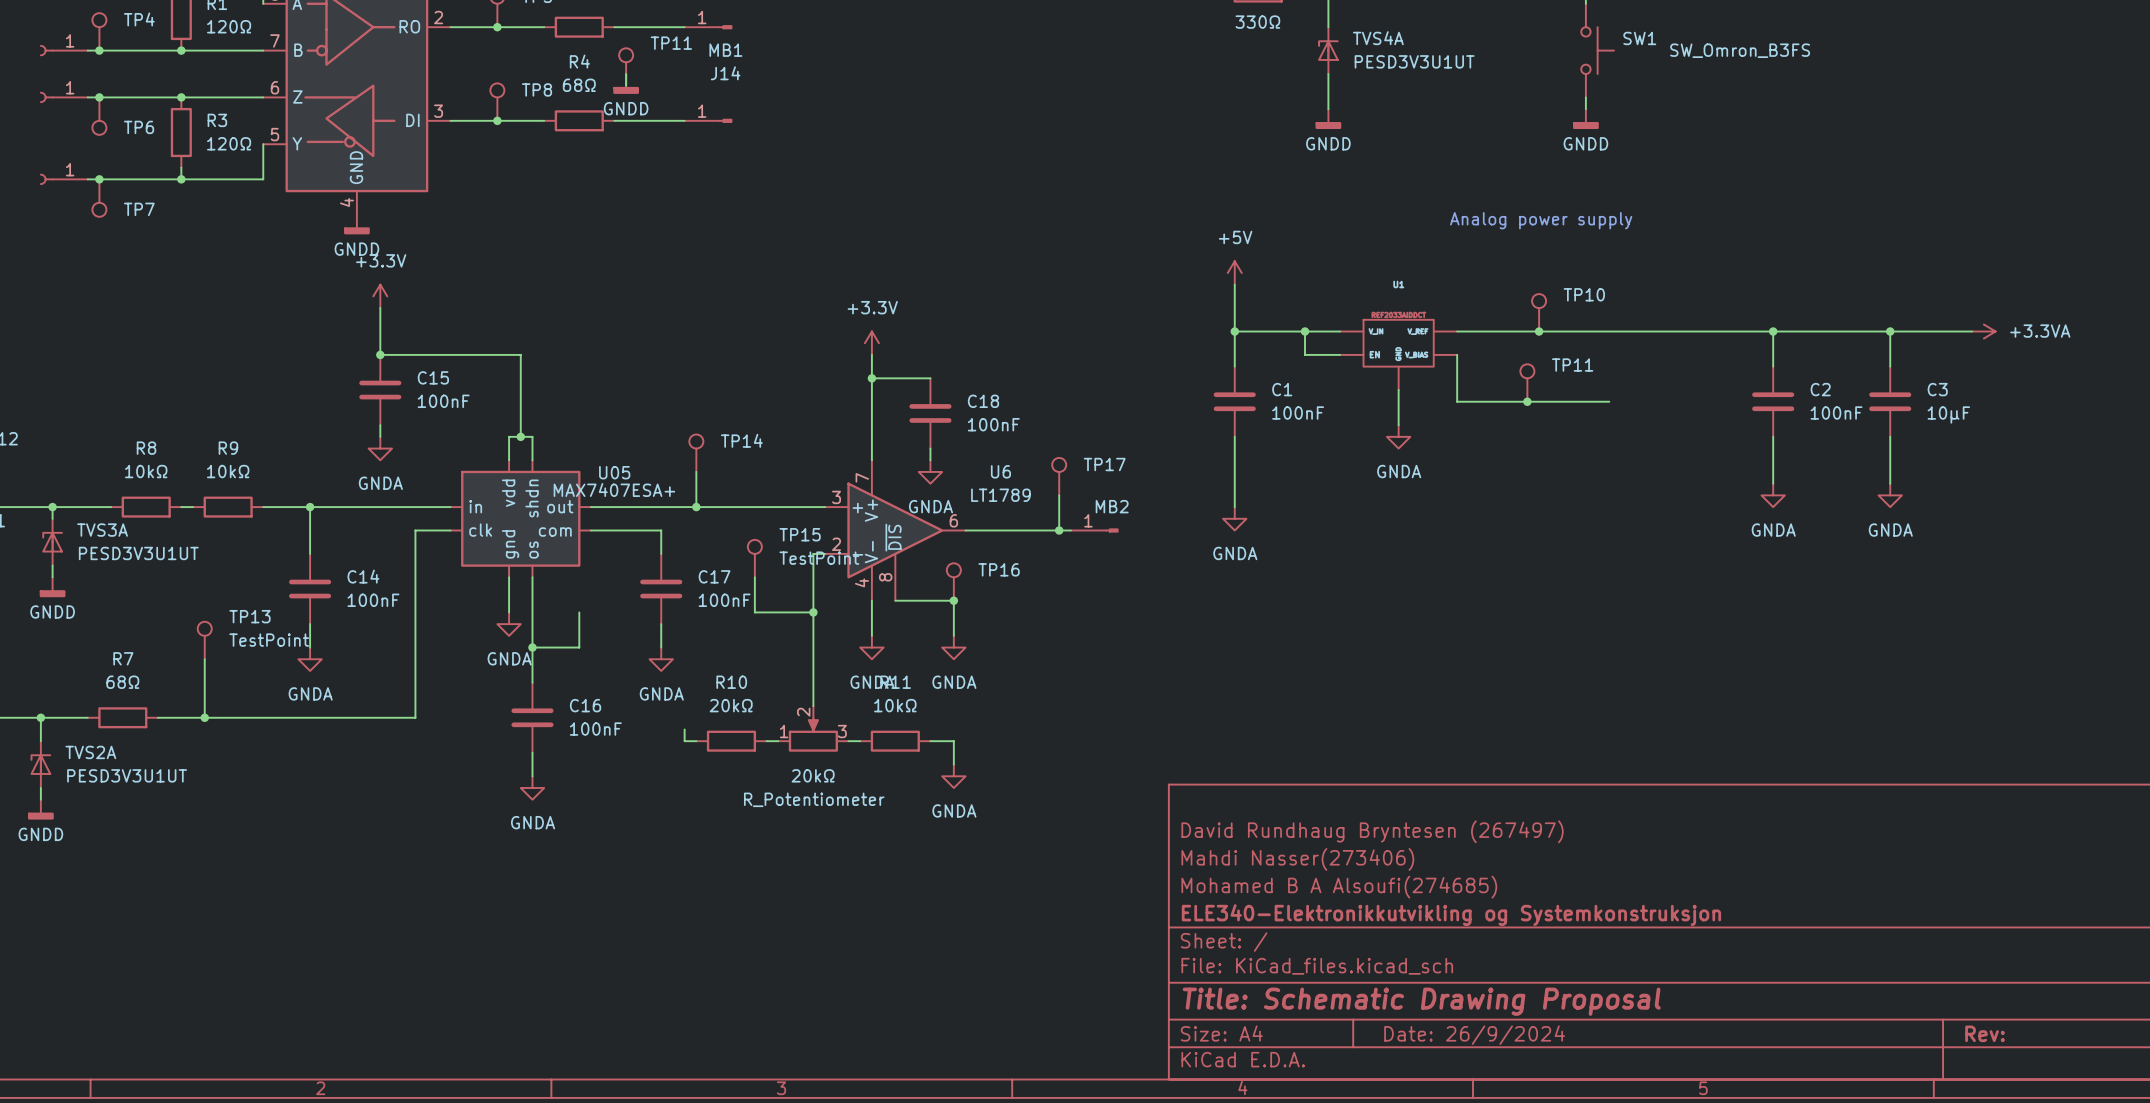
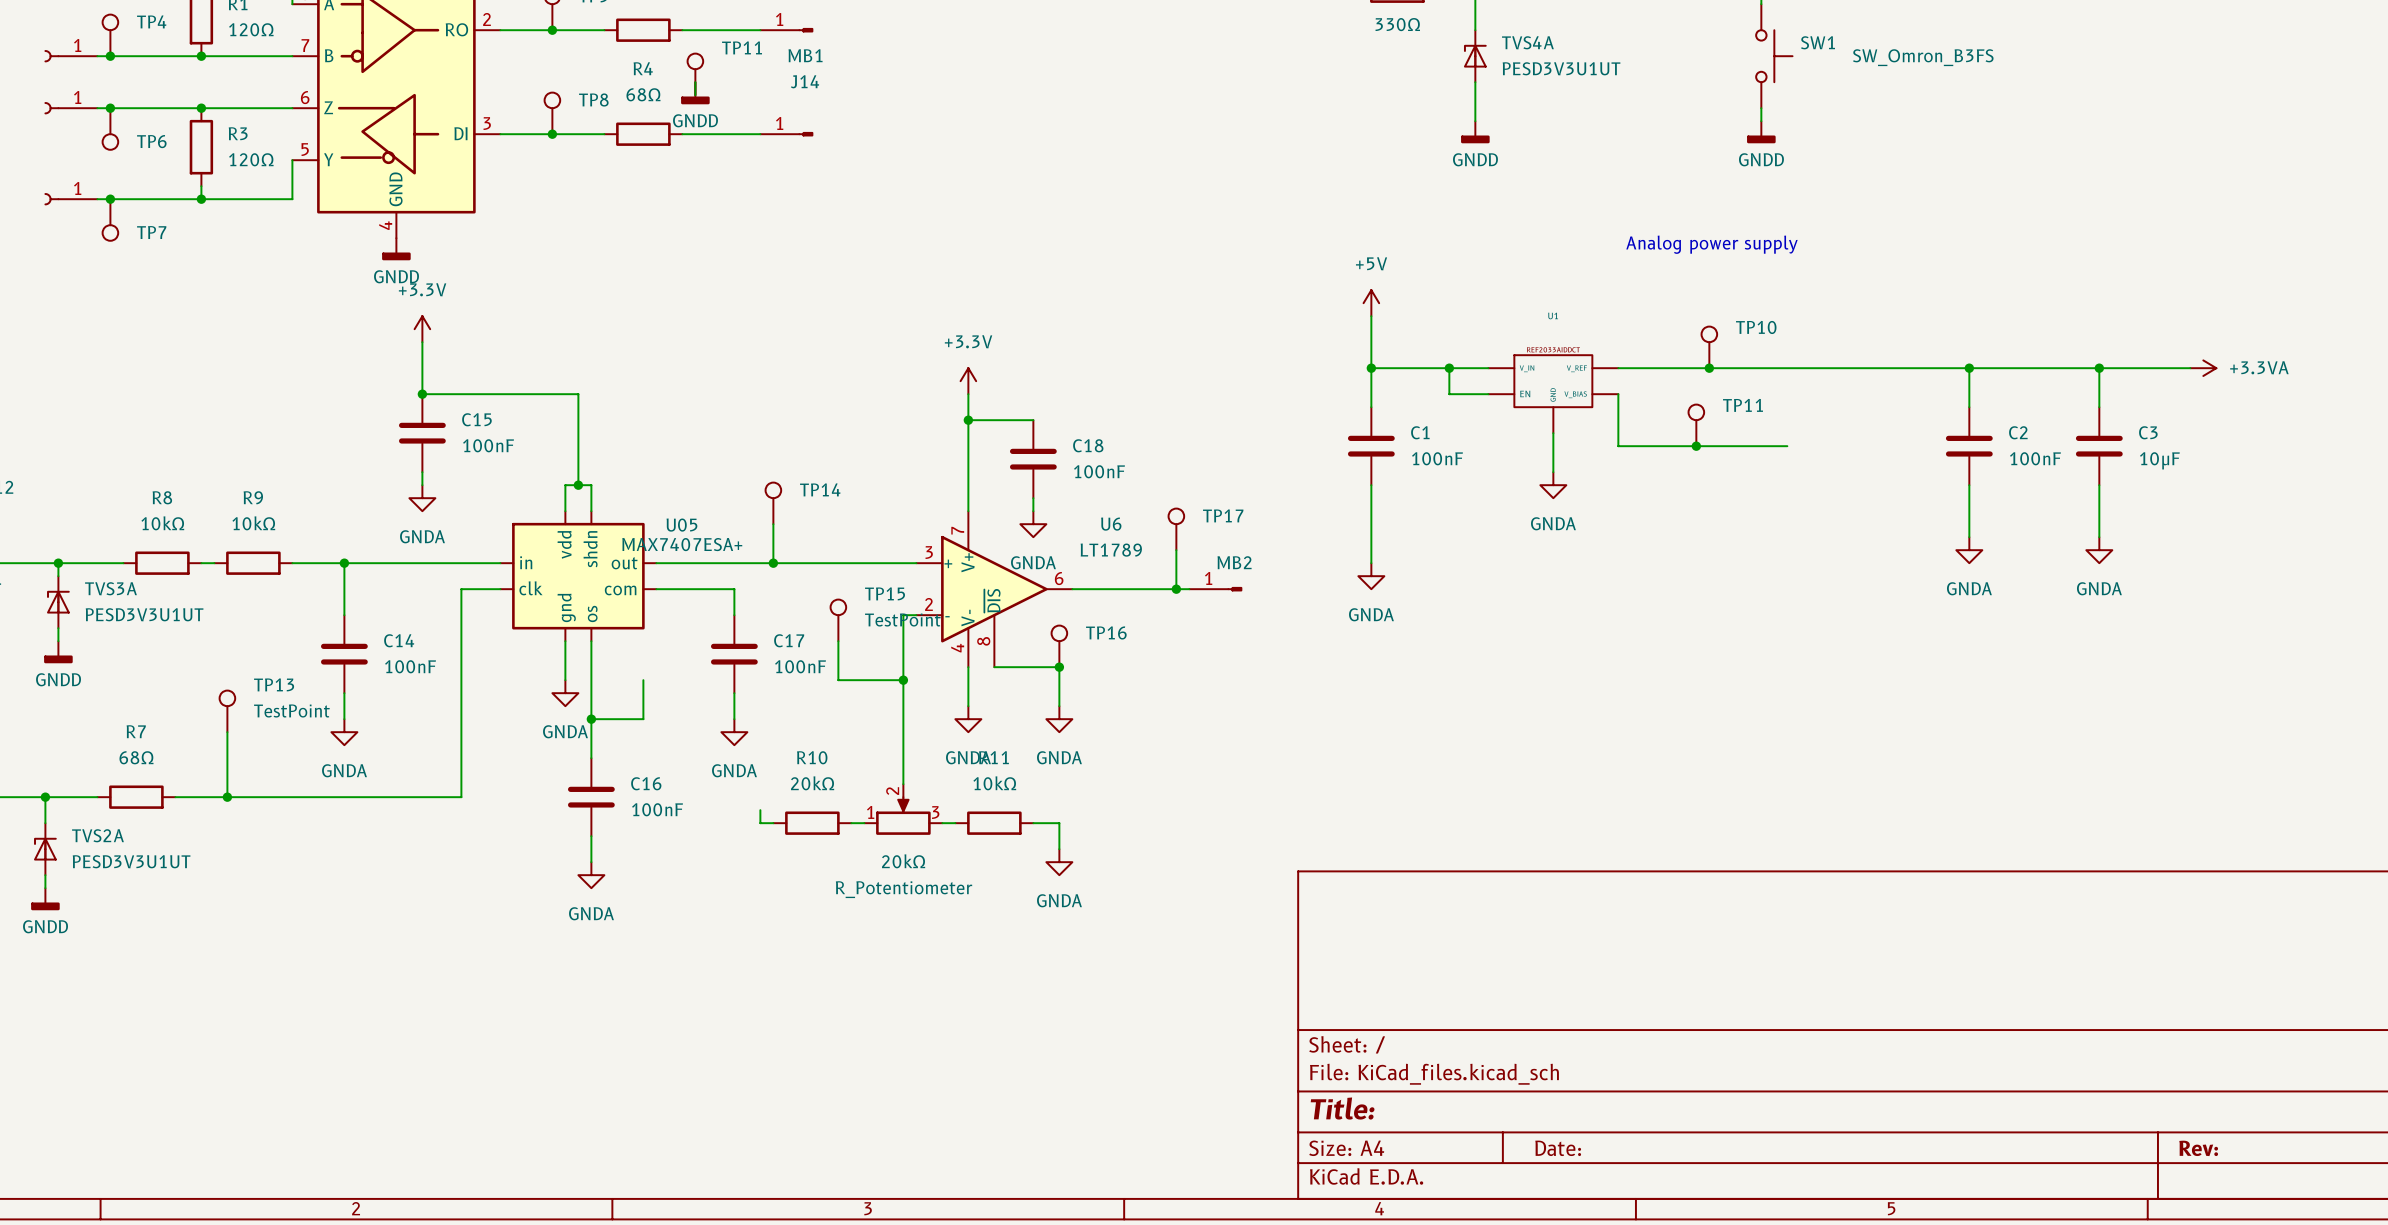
title block: David Rundhaug Bryntesen (267497) (1372, 831) -> none
title block: Mahdi Nasser(273406) (1297, 859) -> none
title block: Mohamed B A Alsoufi(274685) (1339, 887) -> none
title block: ELE340-Elektronikkutvikling og Systemkonstruksjon (1451, 915) -> none
title block: Title: Schematic Drawing Proposal (1421, 1001) -> Title: (1342, 1108)
title block: Date: 26/9/2024 (1474, 1035) -> Date: (1558, 1148)

